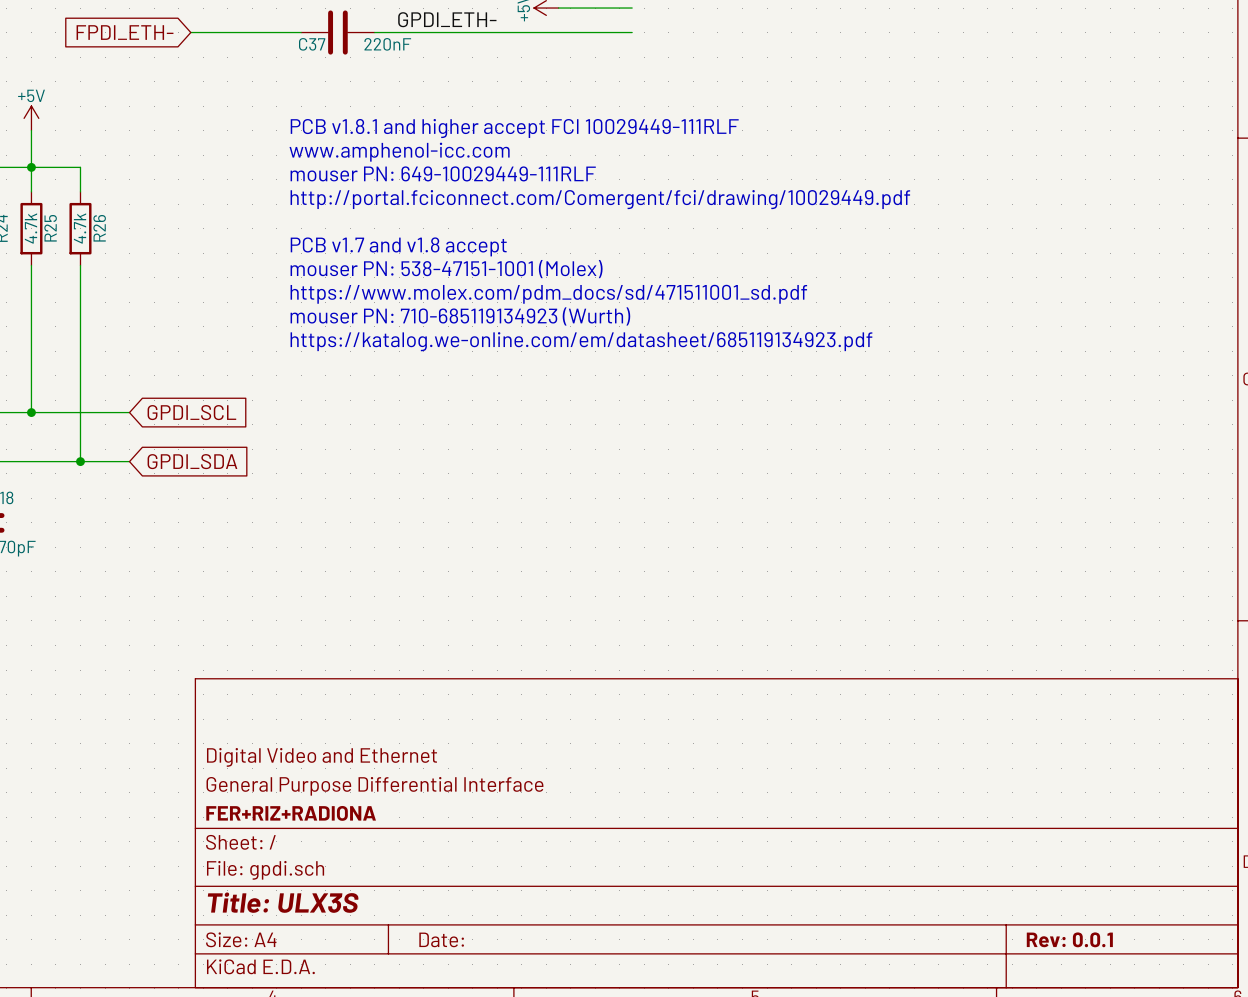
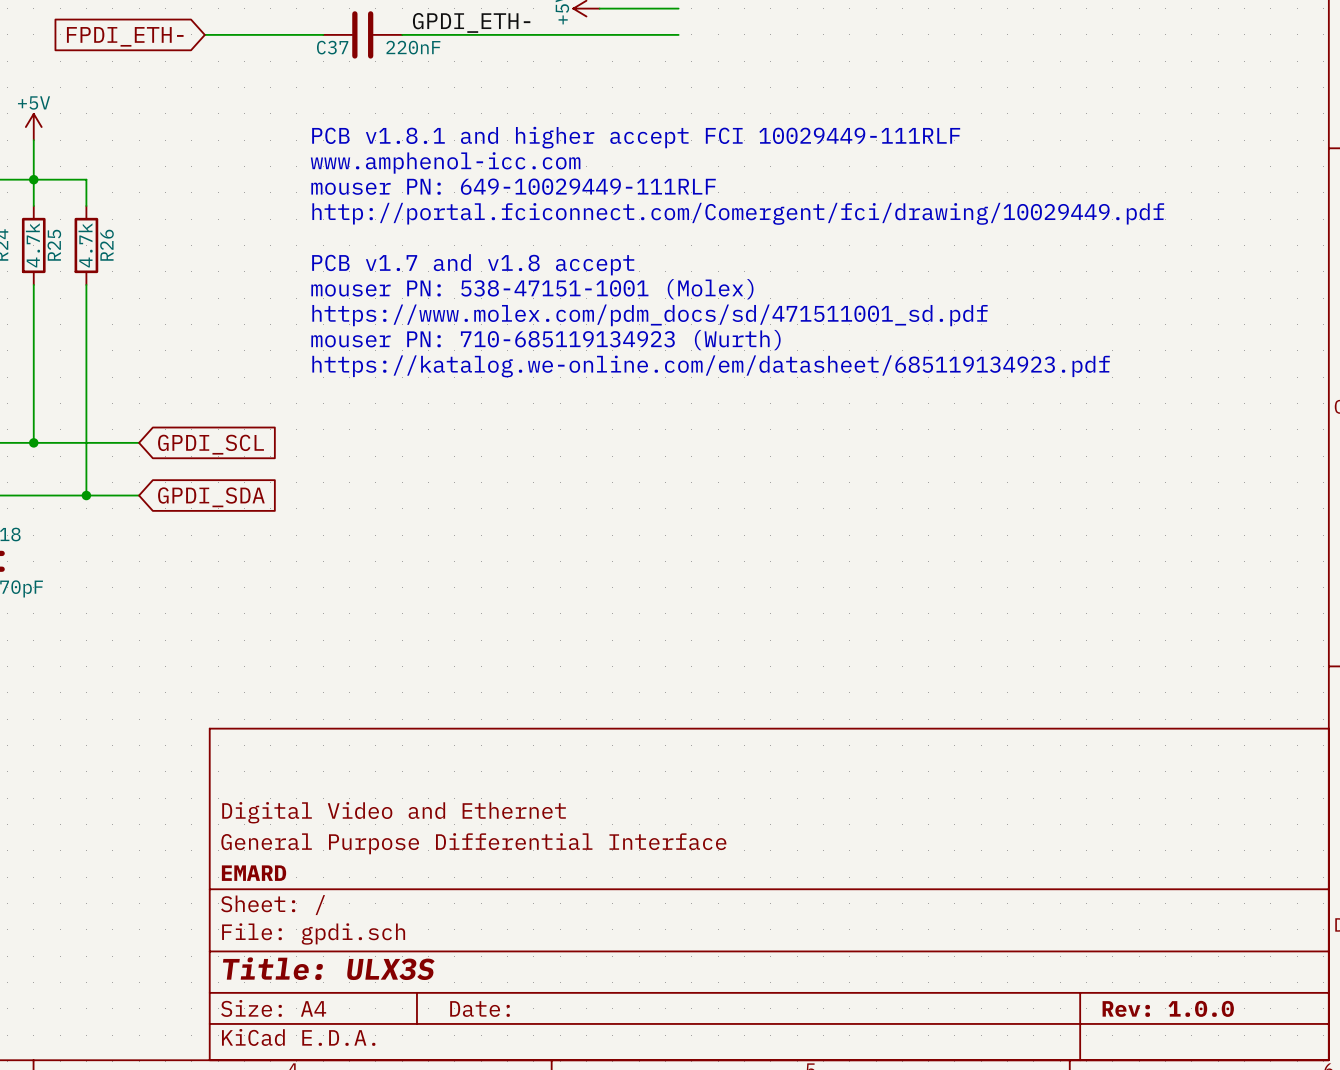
title block: FER+RIZ+RADIONA (291, 813) -> EMARD (254, 873)
title block: Rev: 0.0.1 (1069, 939) -> Rev: 1.0.0 (1168, 1008)

